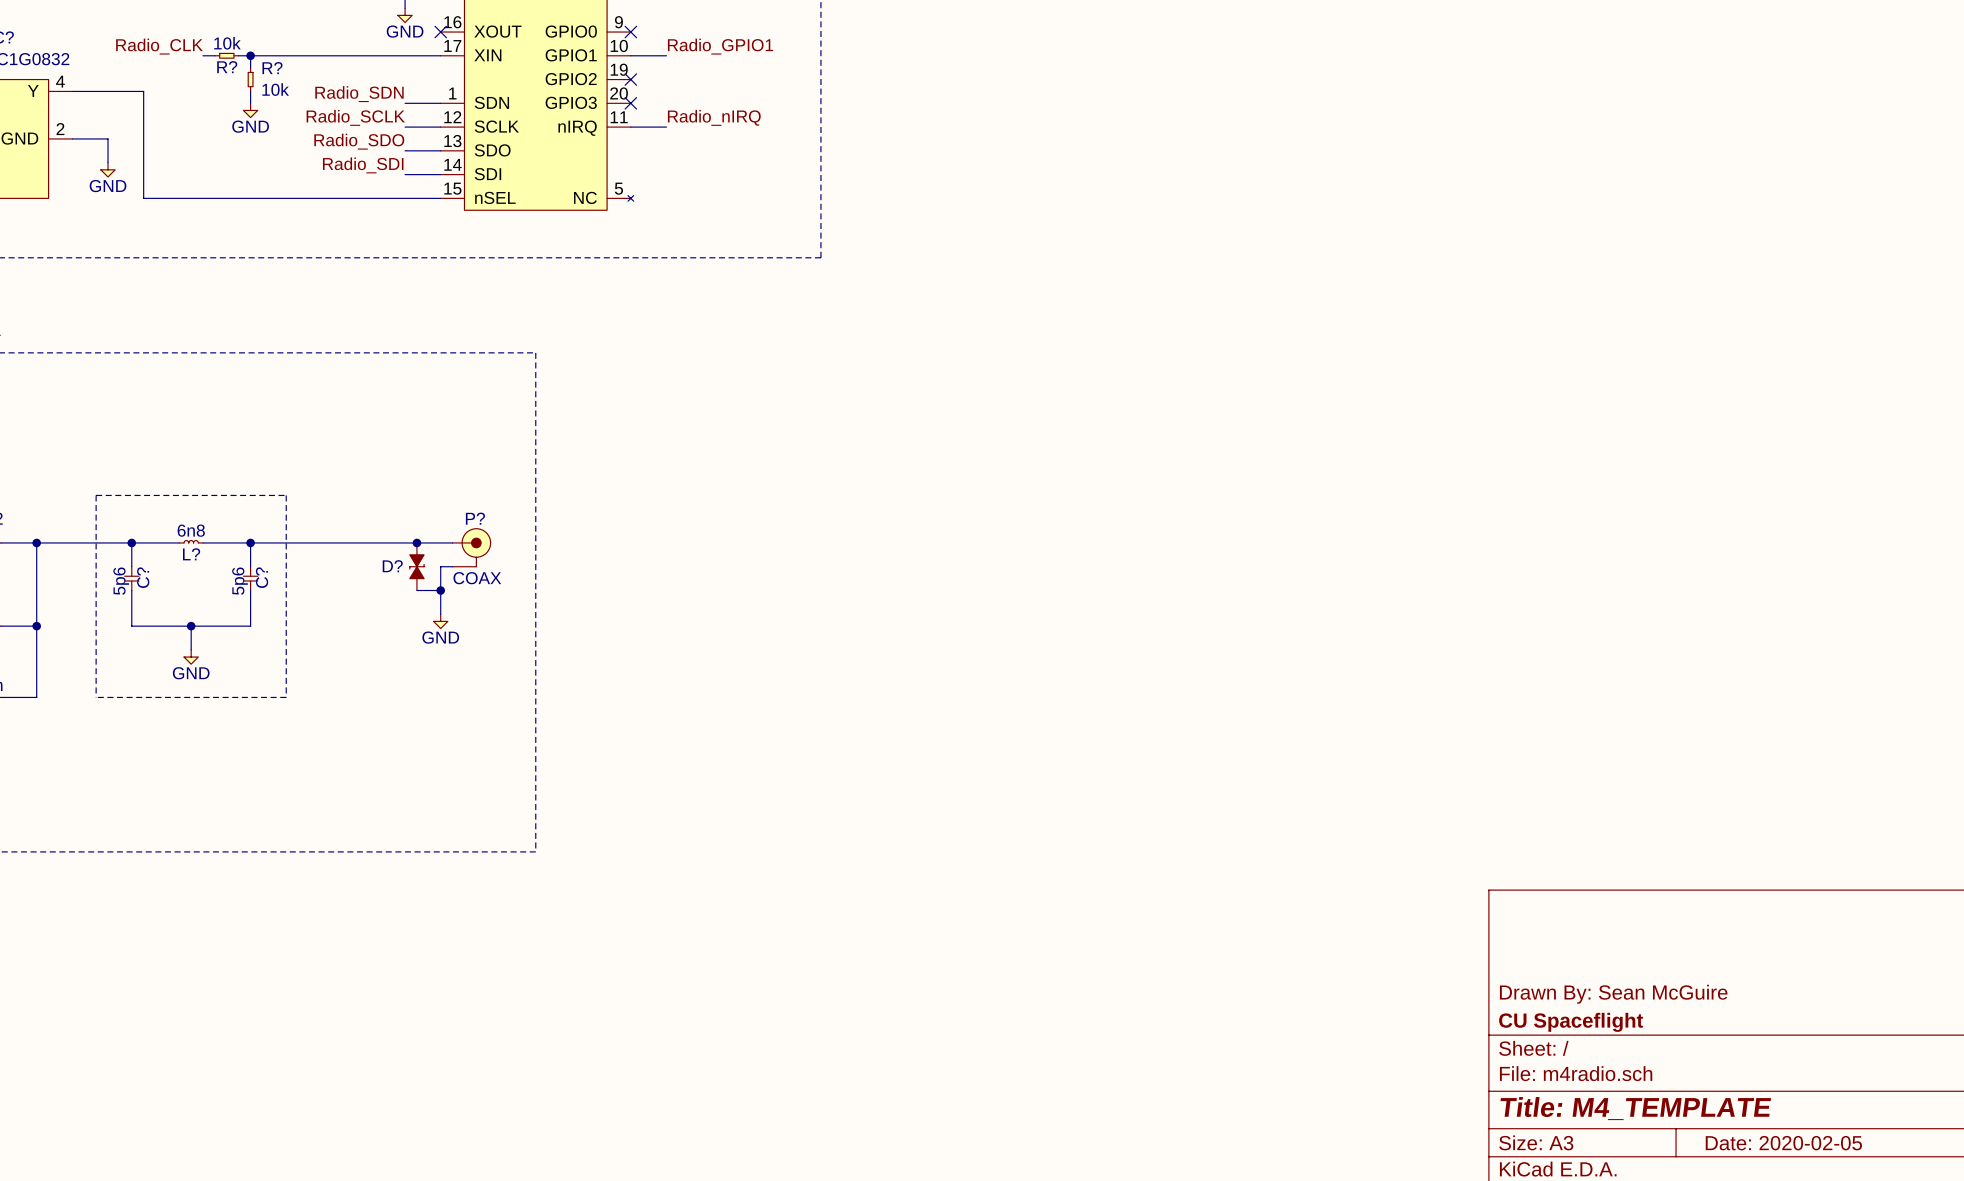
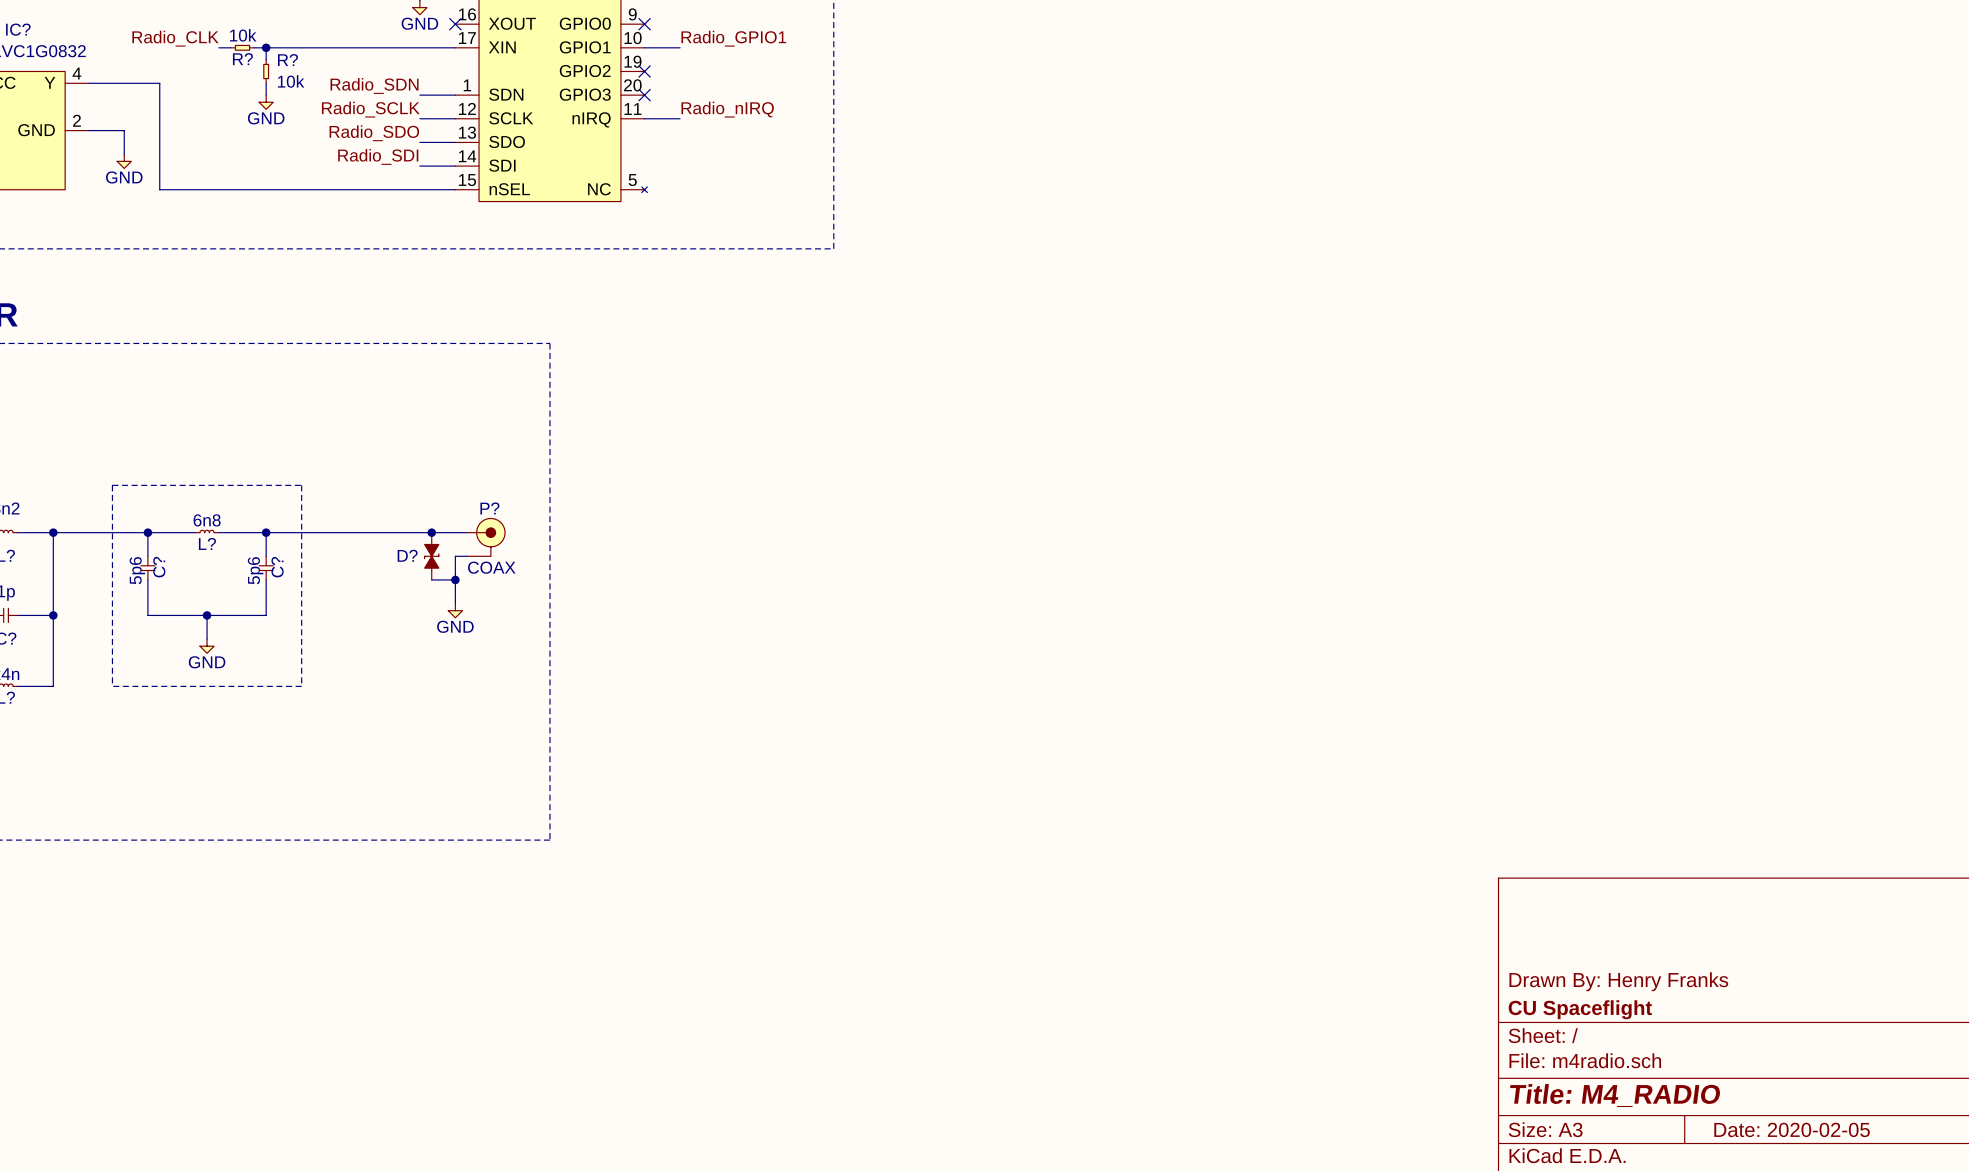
title block: Drawn By: Sean McGuire (1613, 994) -> Drawn By: Henry Franks (1618, 981)
title block: Title: M4_TEMPLATE (1635, 1108) -> Title: M4_RADIO (1615, 1095)

